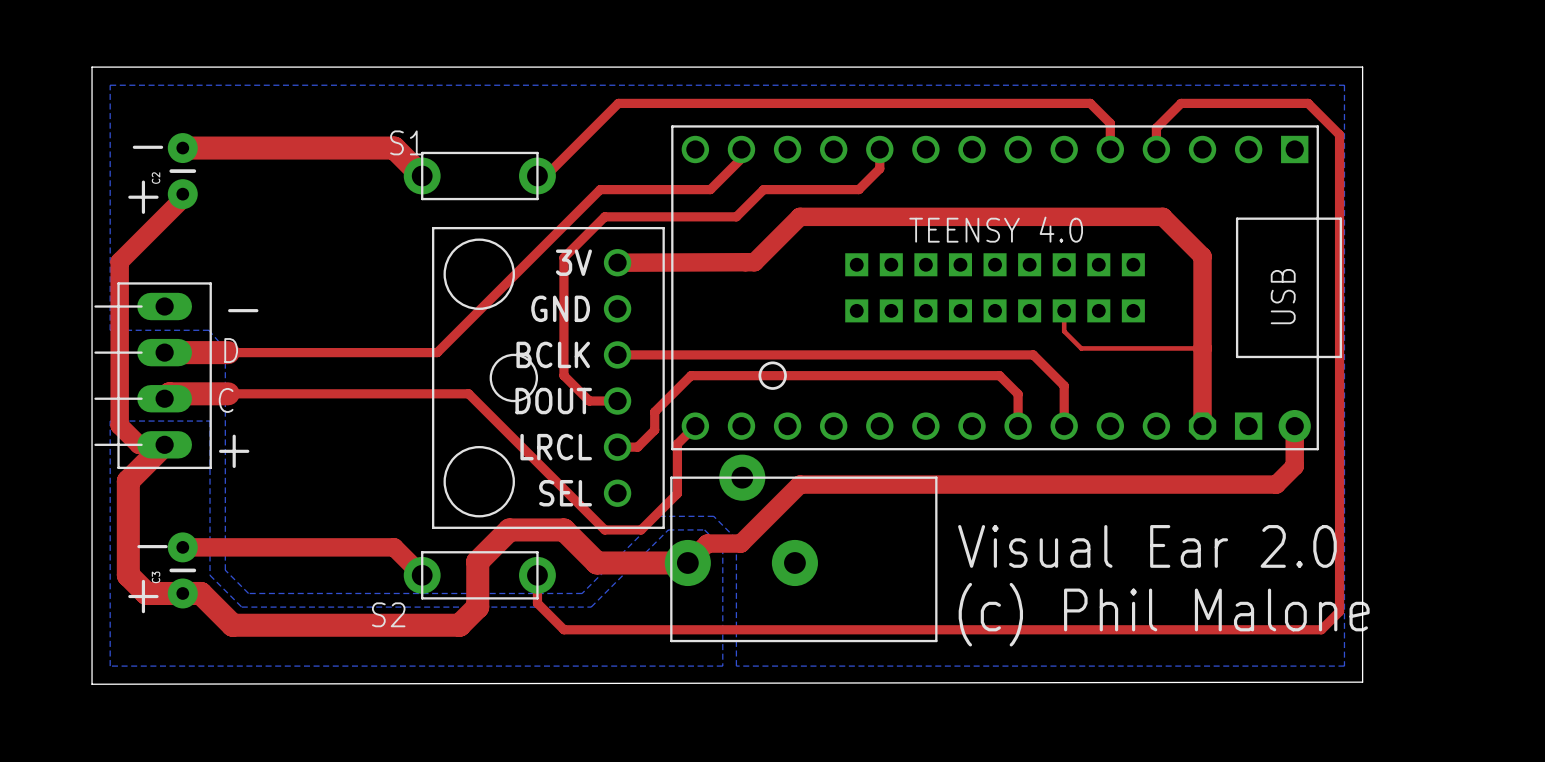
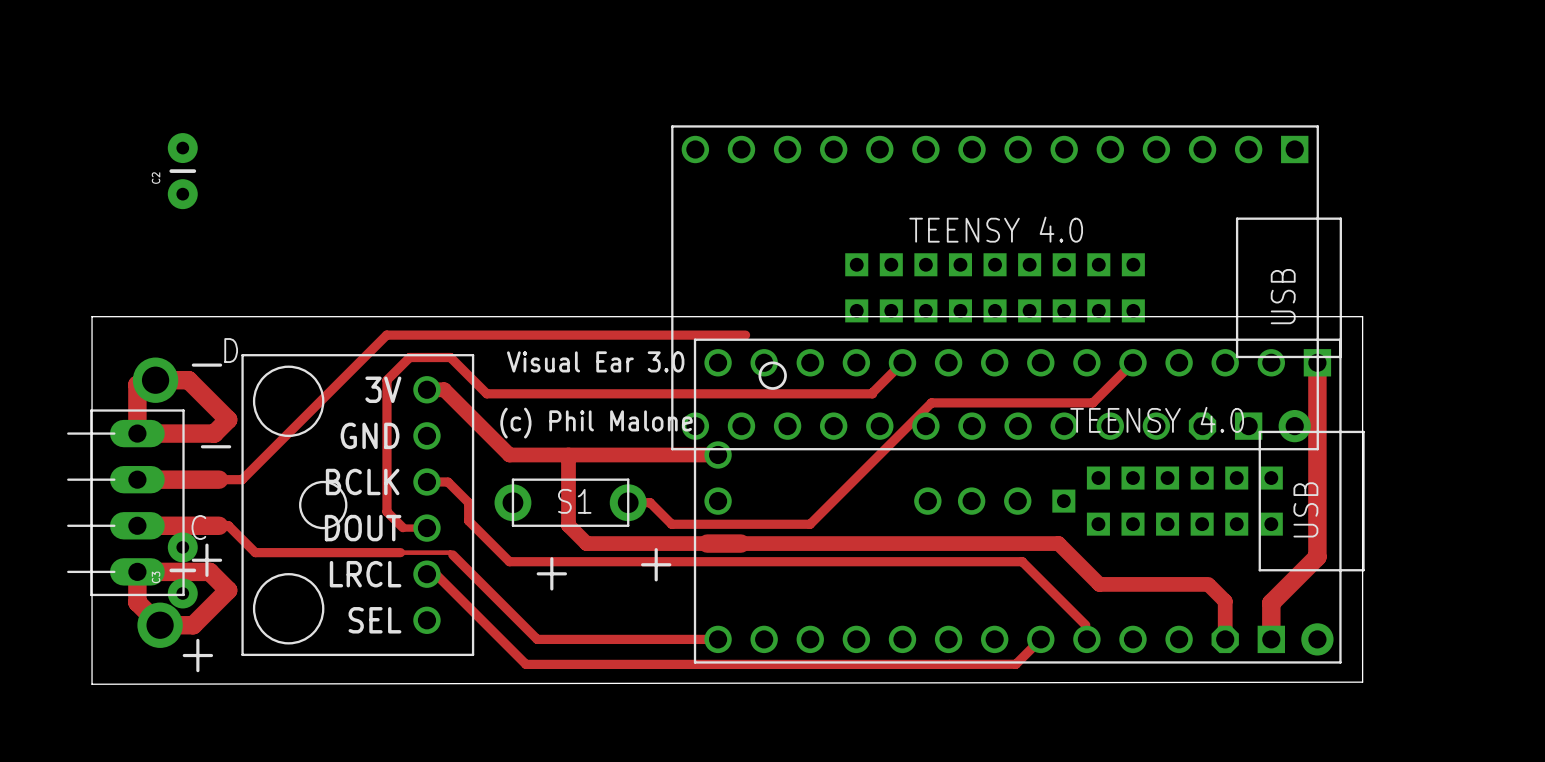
bottom zone outline: (110, 85) (110, 330) (208, 330) (225, 349) (225, 570) (248, 593) (582, 593) (659, 516) (713, 516) (736, 539) (736, 666) (1344, 666) (1344, 85) (110, 85) -> none
S1 name position: S1 (406, 142) -> S1 (574, 501)
text: - (147, 147) -> none
top track: (182, 148) (394, 148) (422, 176) -> none
top track: (741, 149) (741, 158) (710, 189) (600, 189) (437, 352) (164, 352) -> none
top track: (879, 149) (879, 168) (858, 189) (763, 189) (736, 216) (604, 216) (563, 257) (563, 375) (589, 401) (617, 401) -> none
top track: (1110, 149) (1110, 123) (1090, 103) (618, 103) (545, 176) (537, 176) -> none
top track: (1156, 149) (1156, 128) (1181, 103) (1308, 103) (1339, 134) (1339, 611) (1321, 629) (563, 629) (537, 603) (537, 575) -> none
S1 position: (479, 176) -> (570, 502)
top track: (182, 194) (182, 198) (119, 261) (119, 425) (138, 444) (164, 444) (128, 481) (128, 575) (146, 593) (200, 593) (232, 625) (459, 625) (477, 607) (477, 561) (509, 529) (563, 529) (596, 562) (687, 562) (707, 543) -> (568, 454) (568, 525) (586, 543) (707, 543)
text: + (143, 197) -> none
top track: (617, 262) (754, 262) (799, 216) (1162, 216) (1202, 256) (1202, 426) -> none
text position: - (243, 310) -> - (206, 365)
top track: (1064, 310) (1064, 331) (1081, 348) (1202, 348) -> none
board edge: (92, 316) (92, 67) (1362, 67) (1362, 316) -> (92, 316) (1362, 316)
top track: none -> (745, 334) (386, 335) (242, 479) (137, 479)
top track: (617, 354) (1033, 354) (1064, 385) (1064, 426) -> none
text: none -> Visual Ear 3.0 (595, 361)
top track: none -> (1133, 362) (1092, 402) (931, 402) (810, 524) (671, 524) (650, 502) (628, 502)
top track: none -> (1317, 362) (1317, 557) (1271, 603) (1271, 639)
part position: (153, 375) -> (125, 502)
part position: (548, 377) -> (357, 505)
top track: none -> (155, 380) (151, 384) (137, 384) (137, 433) (214, 433) (228, 419) (188, 380) (155, 380)
via: none -> (155, 380)
top track: none -> (426, 389) (444, 389) (509, 454)
top track: none -> (872, 393) (902, 363) (902, 362) (872, 392) (872, 393)
top track: none -> (872, 393) (486, 393) (450, 357) (409, 357) (386, 380) (386, 511) (403, 528) (426, 528)
top track: (164, 398) (169, 393) (468, 393) (604, 529) (641, 529) (677, 493) (677, 444) (695, 426) -> none
text position: C (226, 400) -> C (198, 527)
bottom zone outline: (110, 421) (110, 666) (722, 666) (722, 548) (704, 529) (668, 529) (591, 607) (241, 607) (210, 575) (210, 421) (110, 421) -> none
text: none -> (c) Phil Malone (596, 423)
top track: (1018, 426) (1018, 394) (999, 375) (691, 375) (654, 411) (654, 430) (637, 447) (617, 447) -> none
top track: (1294, 426) (1294, 466) (1276, 484) (799, 484) (740, 543) -> (1225, 639) (1225, 601) (1208, 584) (1099, 584) (1058, 543) (740, 543)
text: none -> - (216, 446)
text: + (234, 451) -> none
top track: none -> (509, 454) (718, 454) (509, 454)
top track: none -> (426, 481) (447, 481) (468, 502) (468, 520) (509, 561) (1022, 561) (1085, 625) (1086, 639)
part: none -> (1029, 501)
top track: none -> (137, 525) (228, 525) (255, 552) (450, 552) (537, 639) (718, 639)
text: - (152, 546) -> none
text: Visual Ear 2.0 (1147, 546) -> none
top track: (182, 547) (394, 547) (422, 575) -> none
part: (801, 548) -> none
text: none -> + (206, 560)
text: none -> + (656, 564)
top track: none -> (137, 571) (209, 571) (228, 590) (193, 625) (160, 625) (137, 602) (137, 571)
text: none -> + (551, 573)
top track: none -> (426, 574) (435, 574) (525, 664) (1015, 664) (1040, 639)
S2: (479, 575) -> none
text position: + (143, 596) -> + (197, 655)
text: (c) Phil Malone (1164, 614) -> none
via: none -> (160, 625)

